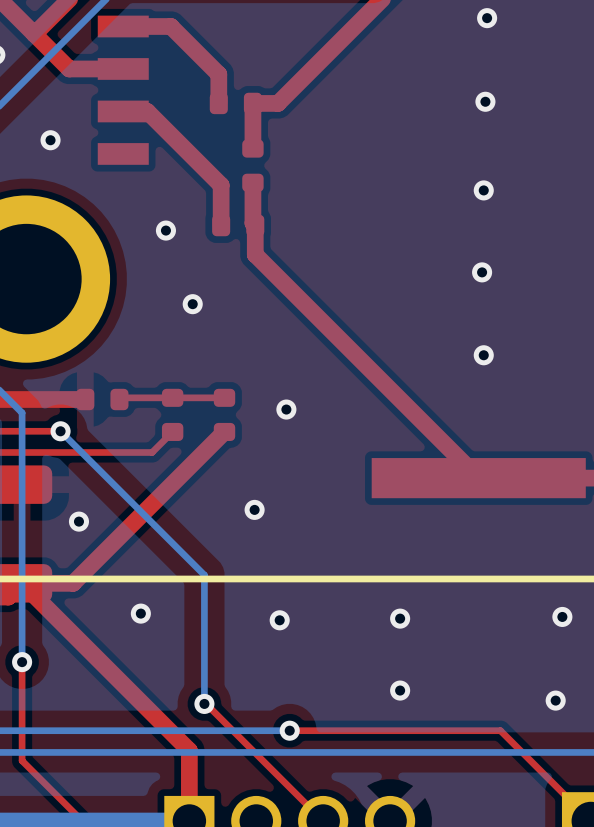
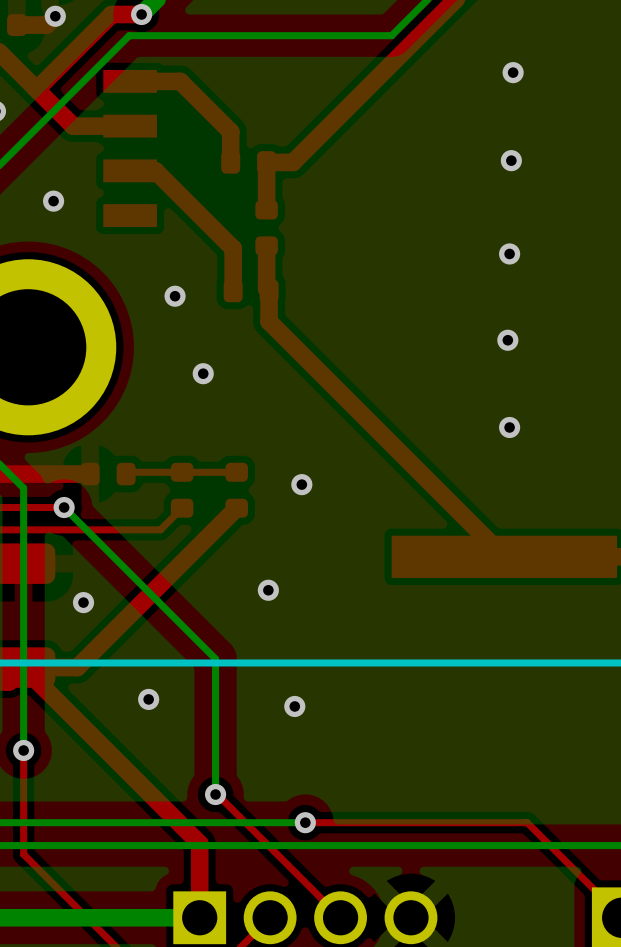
via: (562, 616) -> none
via: (400, 618) -> none
via: (400, 690) -> none
via: (555, 700) -> none

